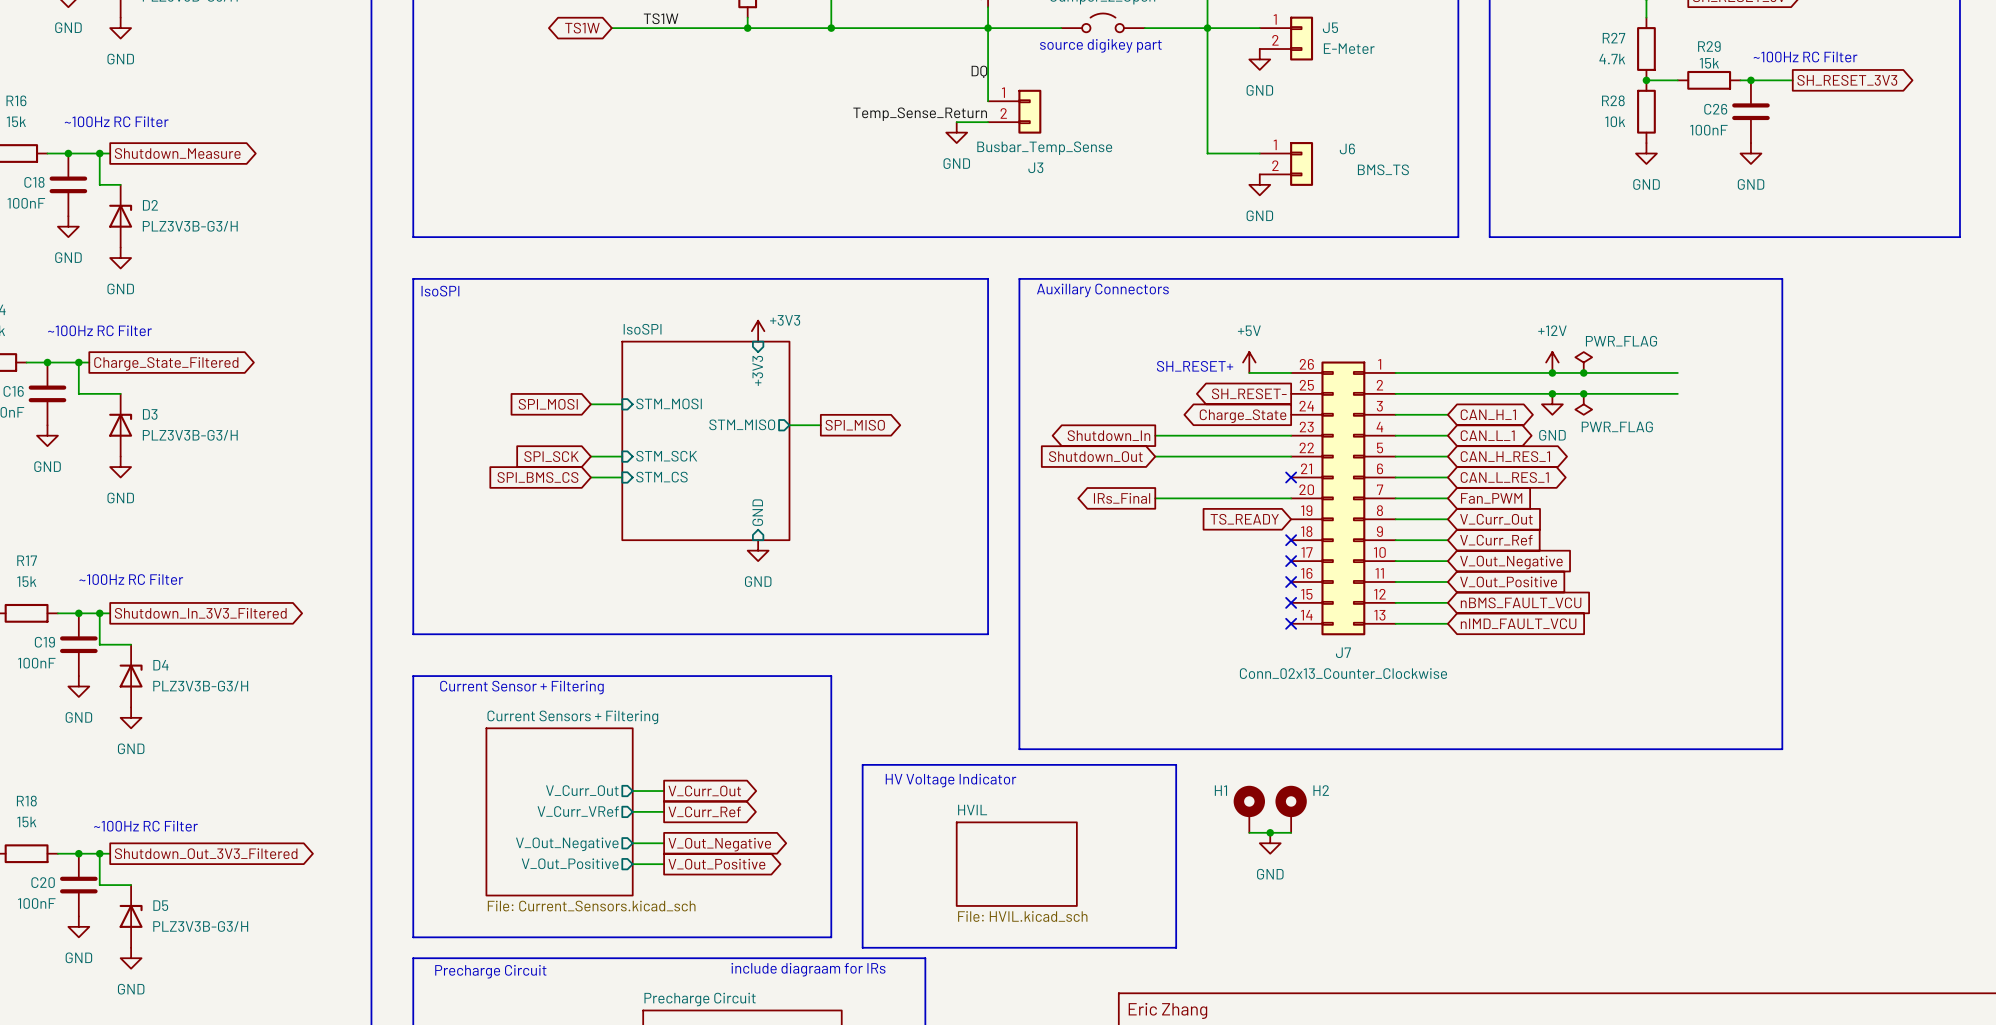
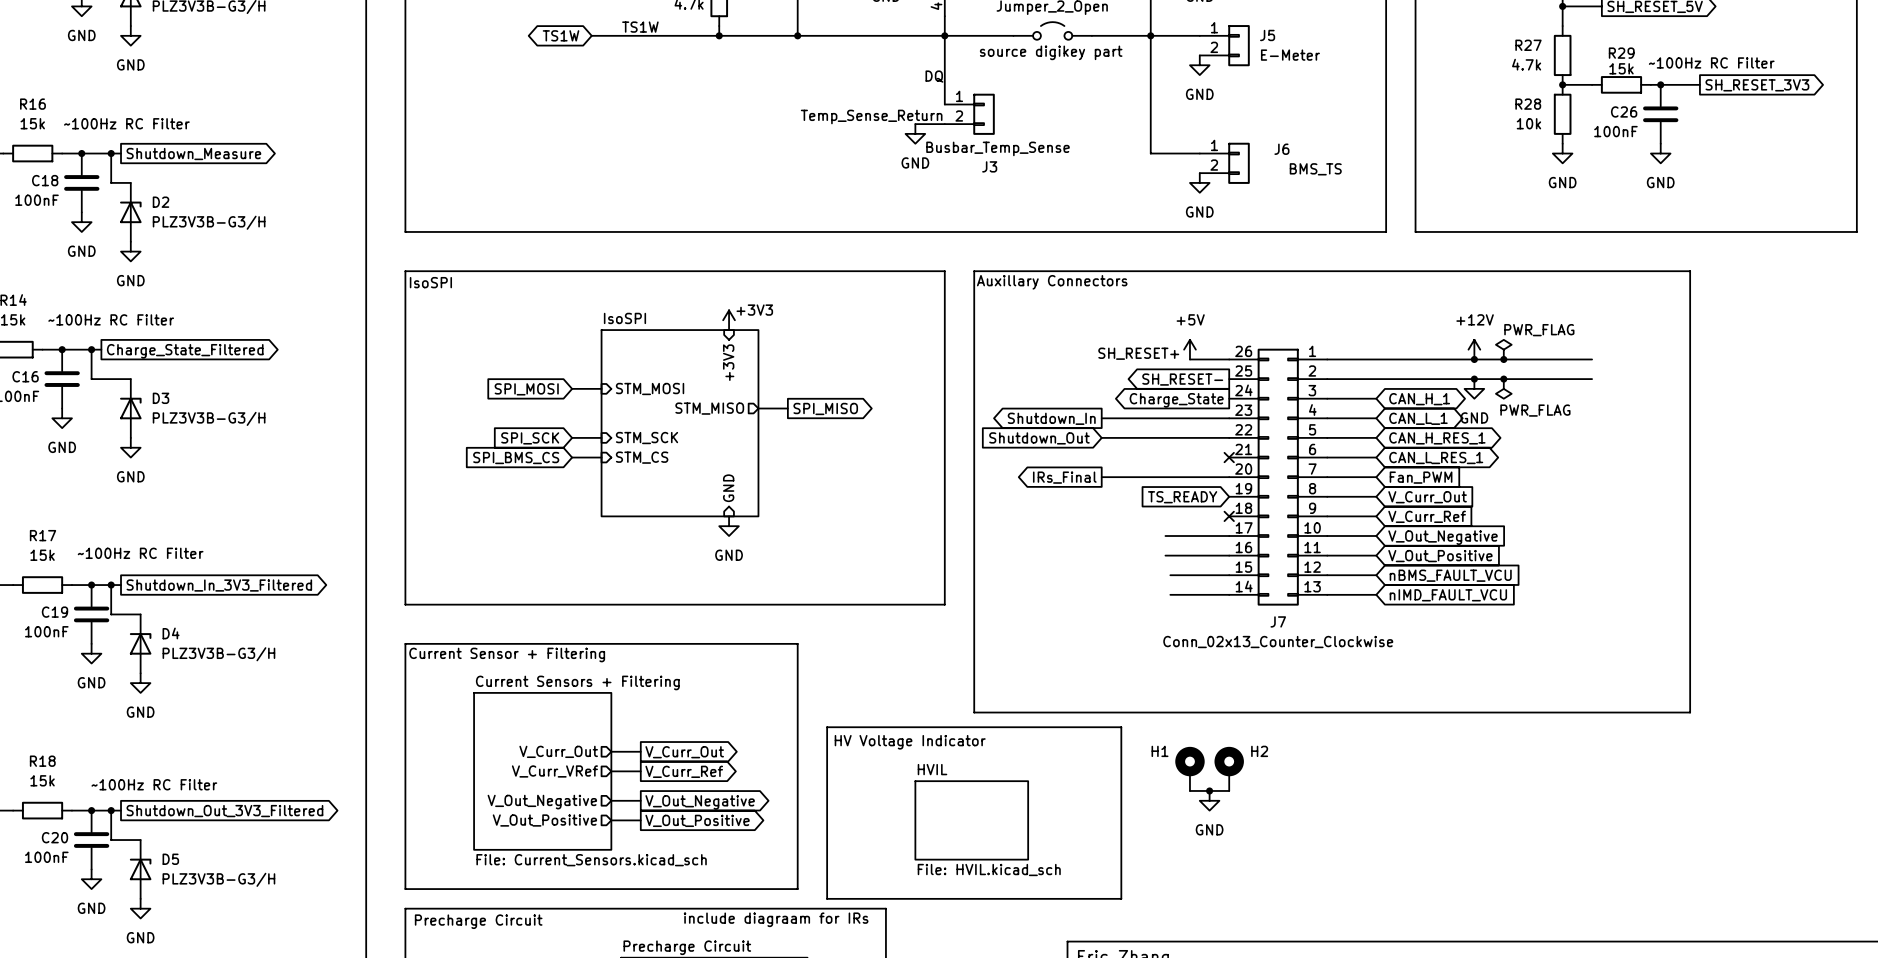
wire: none -> (1165, 536) (1229, 536)
no-connect mark: (1291, 561) -> none
wire: none -> (1165, 555) (1229, 555)
no-connect mark: (1291, 581) -> none
wire: none -> (1170, 575) (1229, 575)
no-connect mark: (1291, 602) -> none
wire: none -> (1170, 594) (1229, 594)
no-connect mark: (1291, 623) -> none

